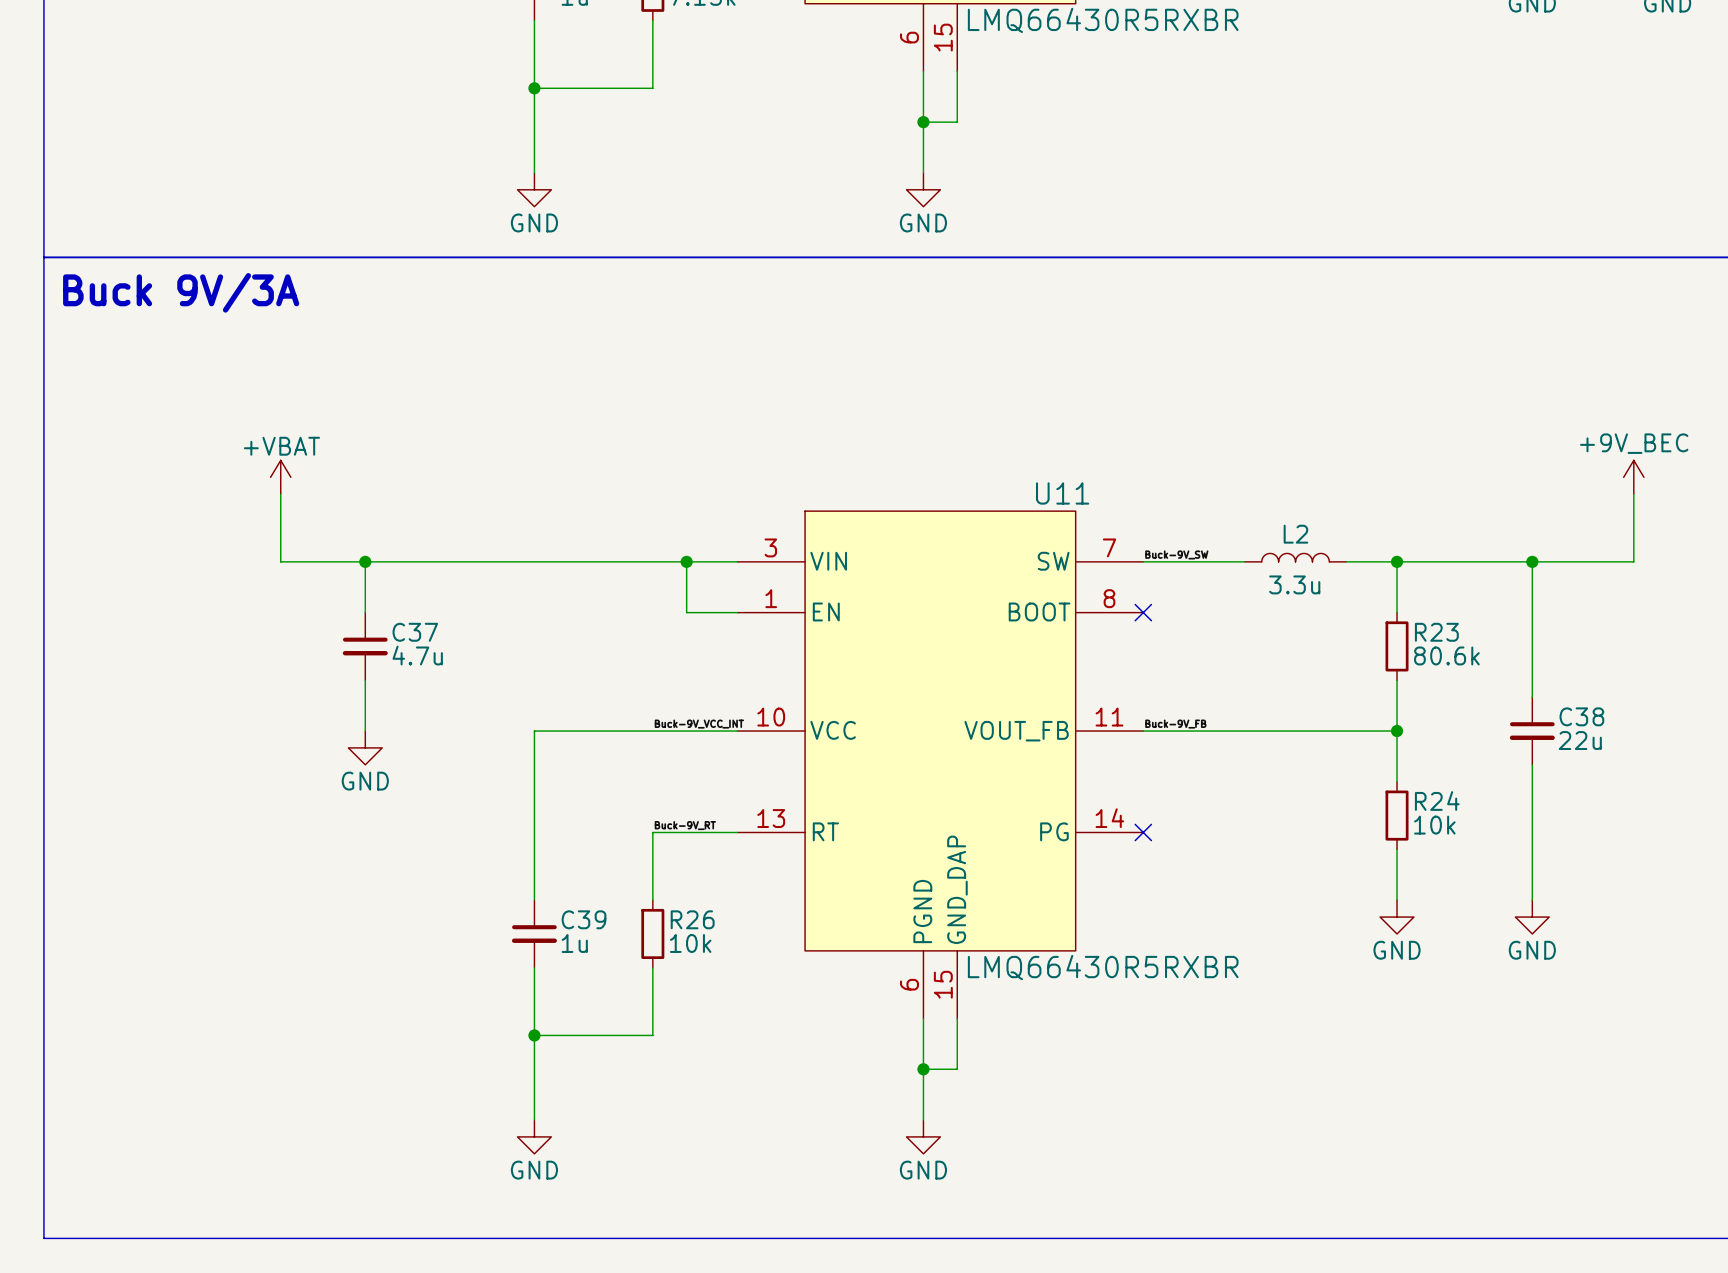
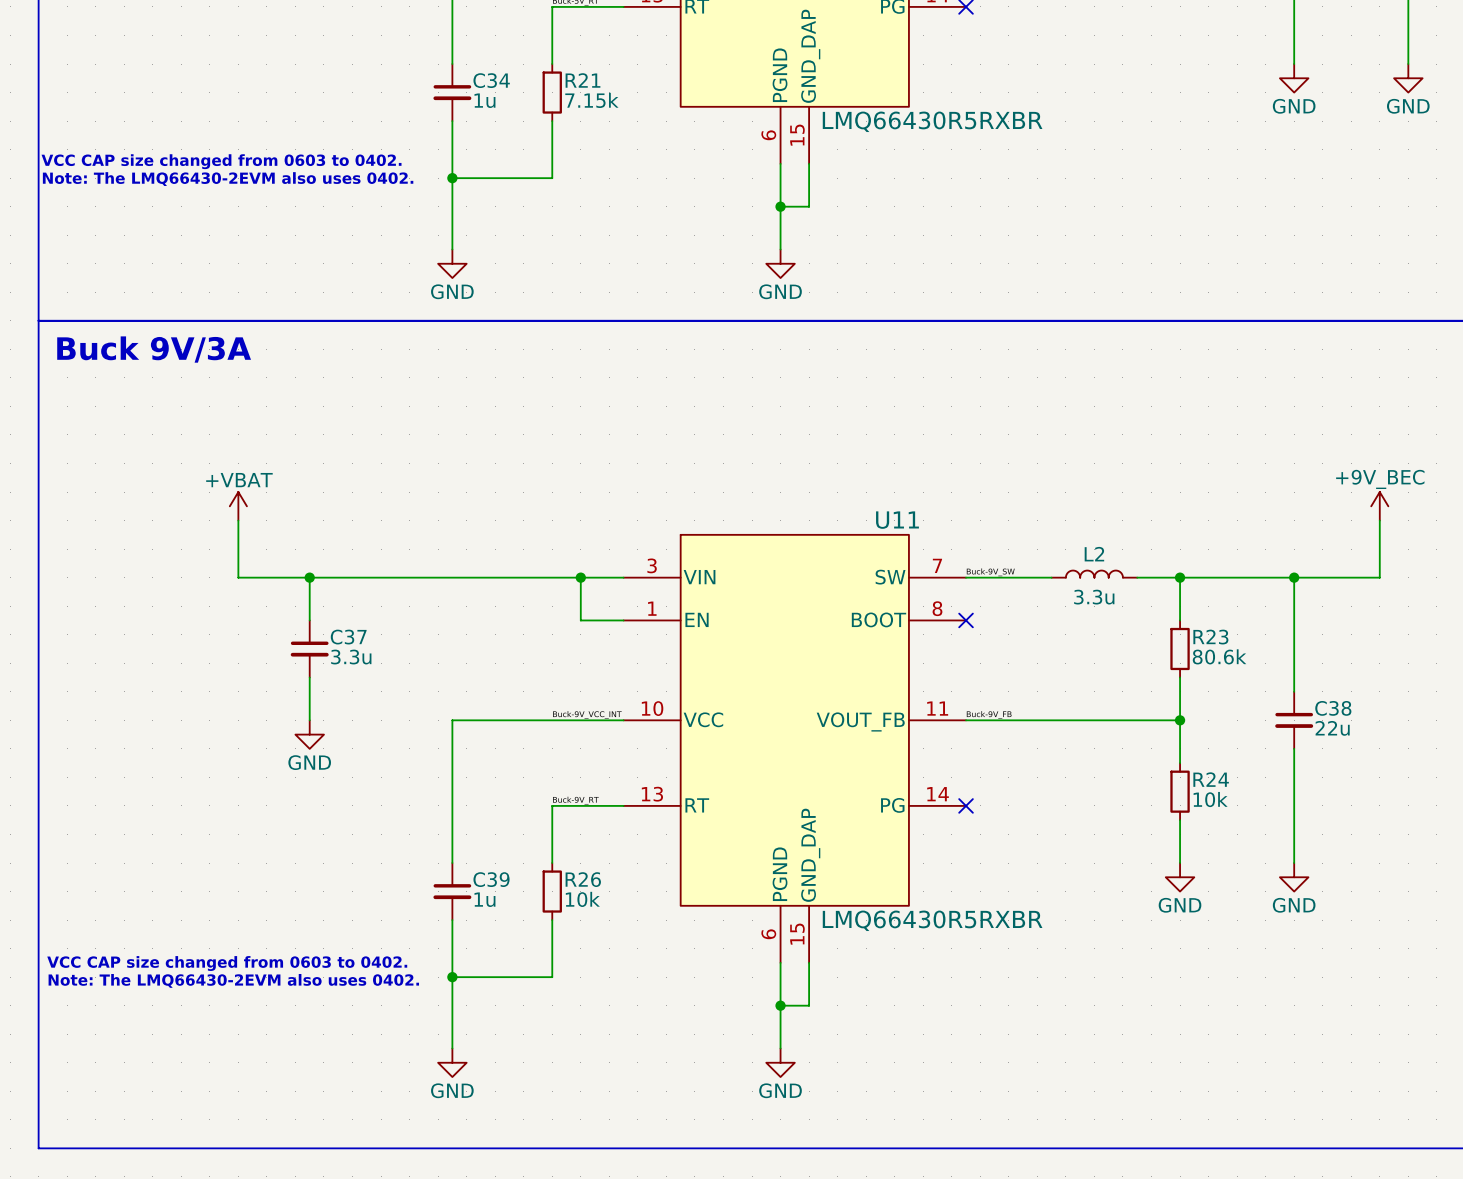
text: none -> VCC CAP size changed from 0603 to 0402. (221, 161)
text: none -> Note: The LMQ66430-2EVM also uses 0402. (228, 179)
C37 value: 4.7u (417, 655) -> 3.3u (351, 657)
text: none -> VCC CAP size changed from 0603 to 0402. (227, 963)
text: none -> Note: The LMQ66430-2EVM also uses 0402. (233, 980)

